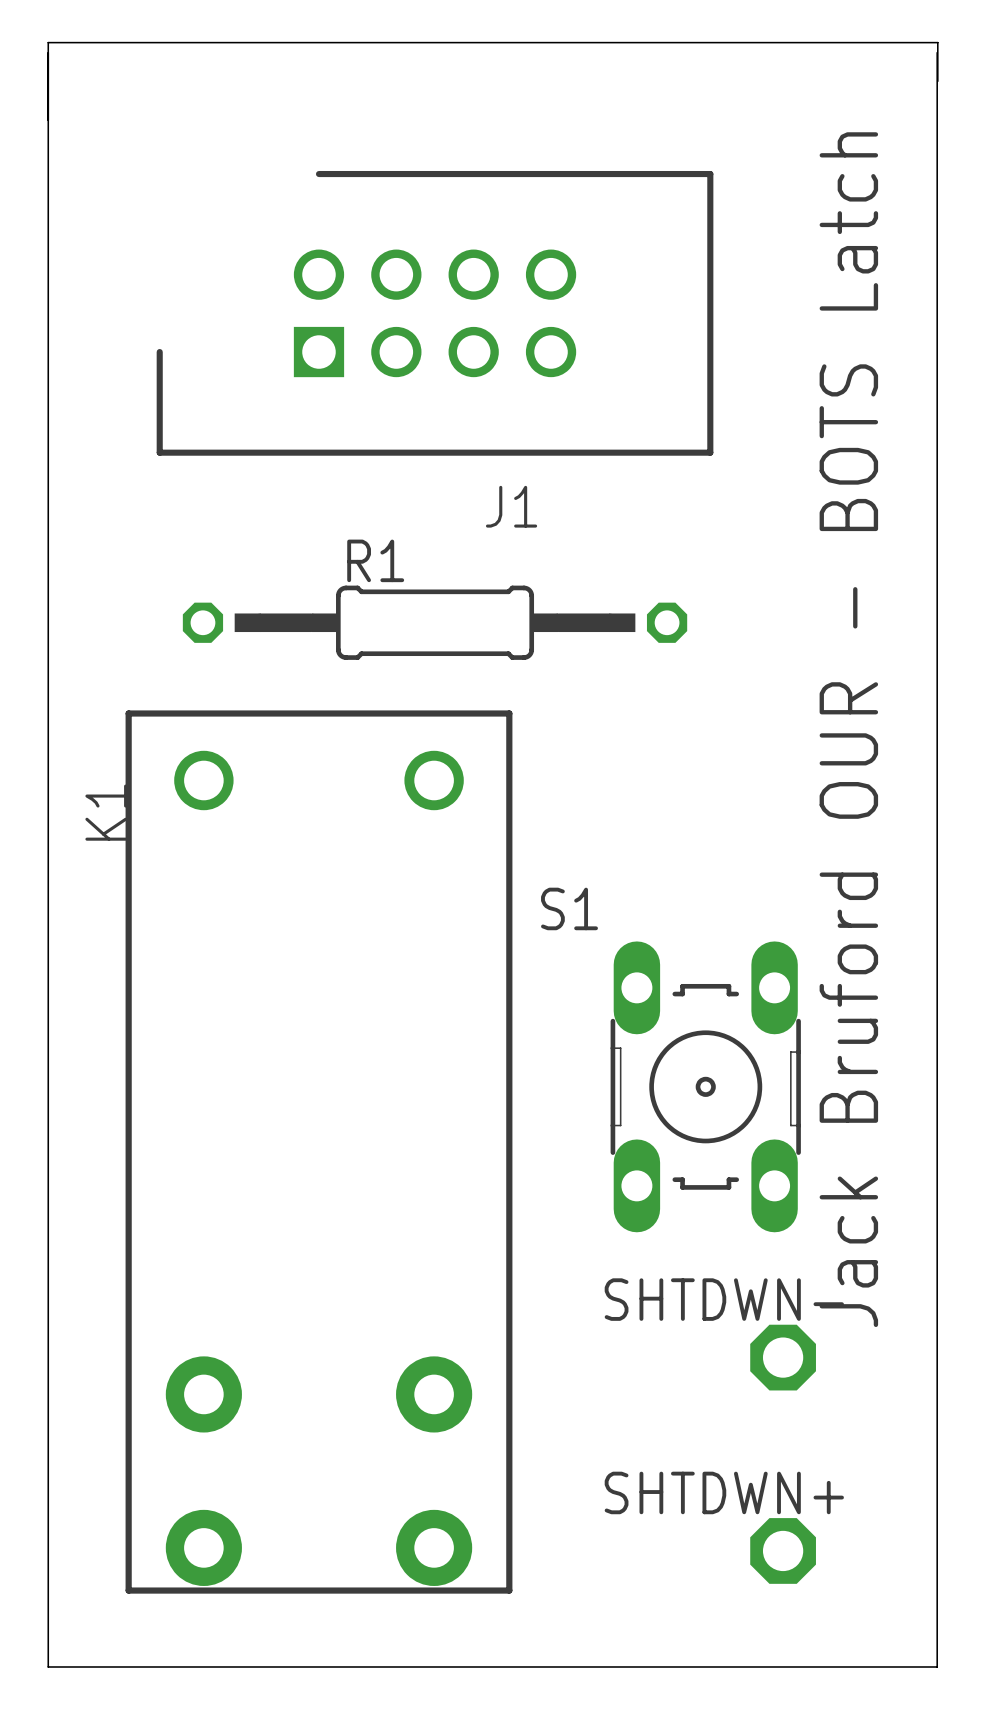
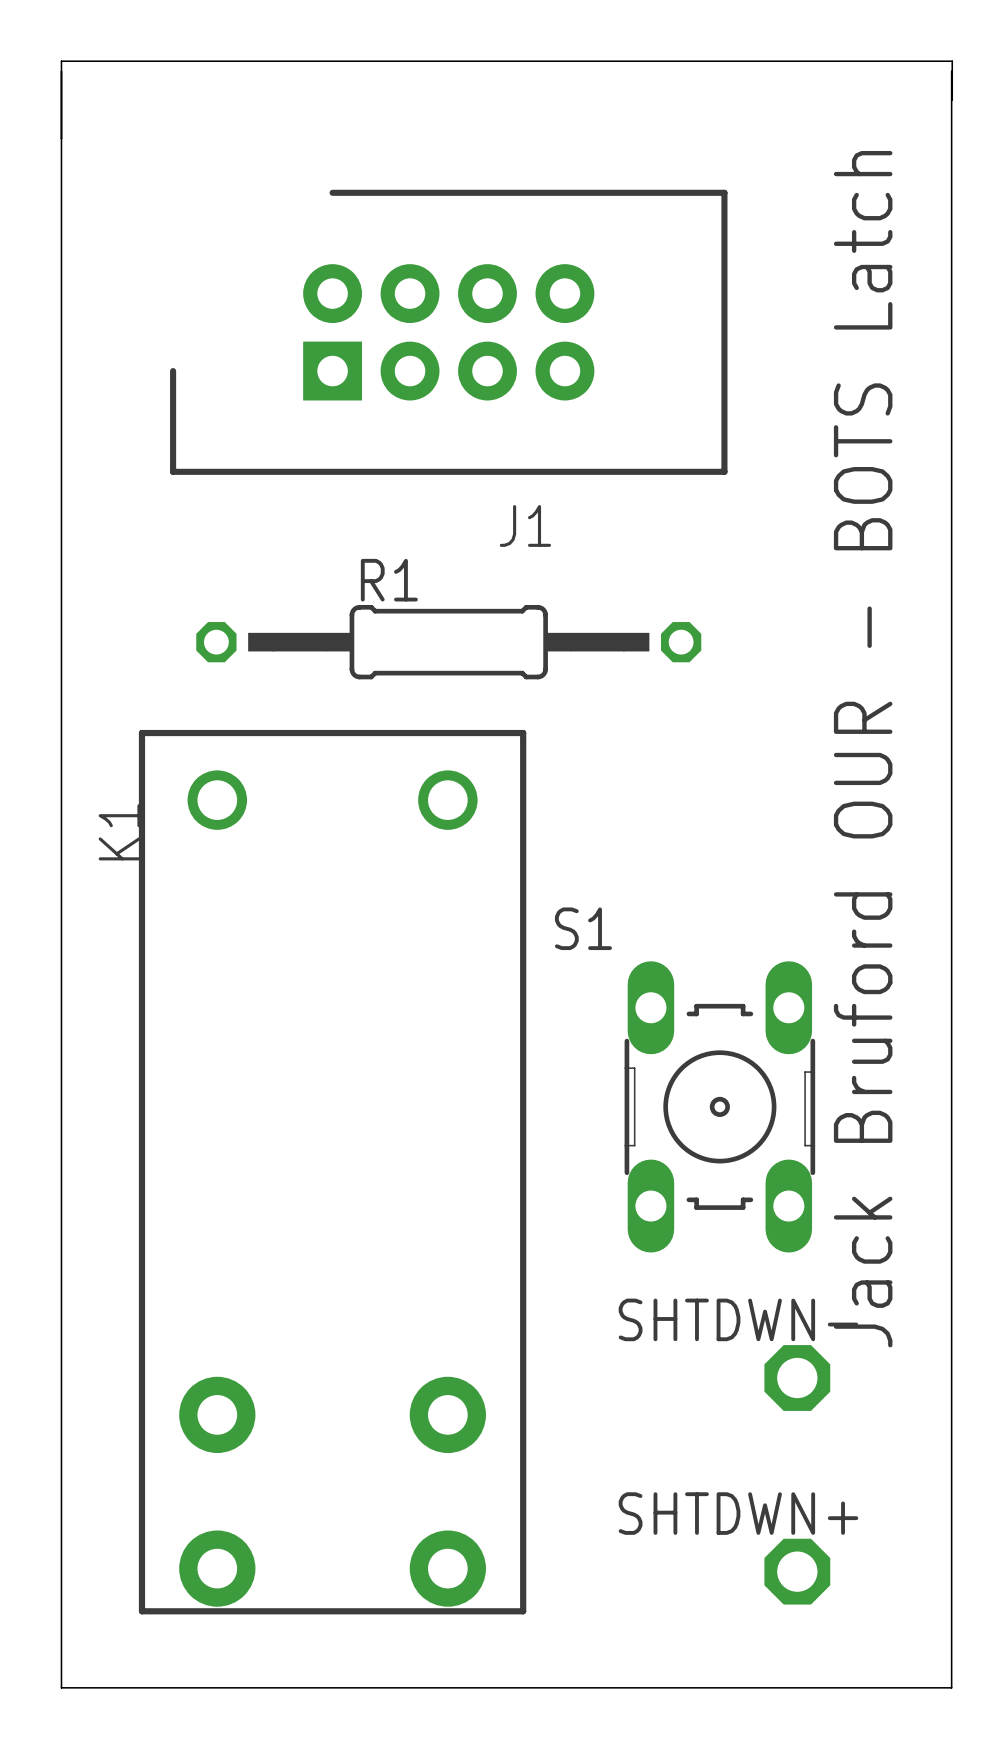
J1 footprint: [156, 170, 714, 456] -> [170, 189, 728, 475]

